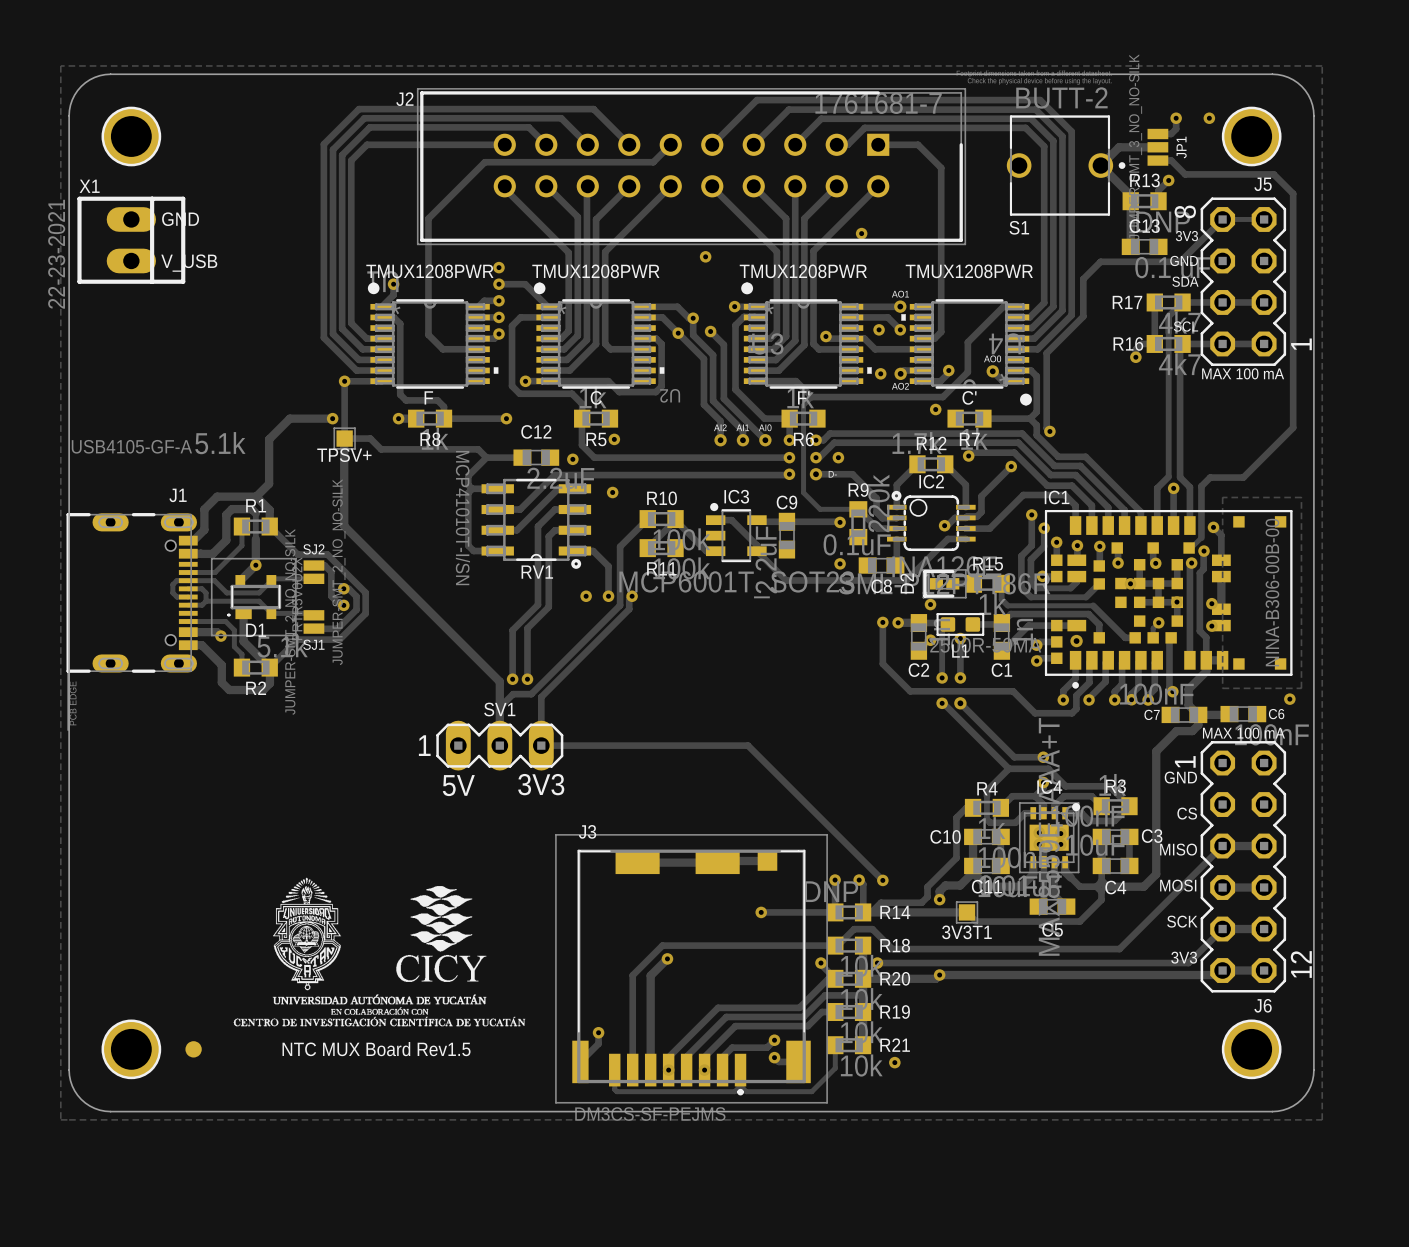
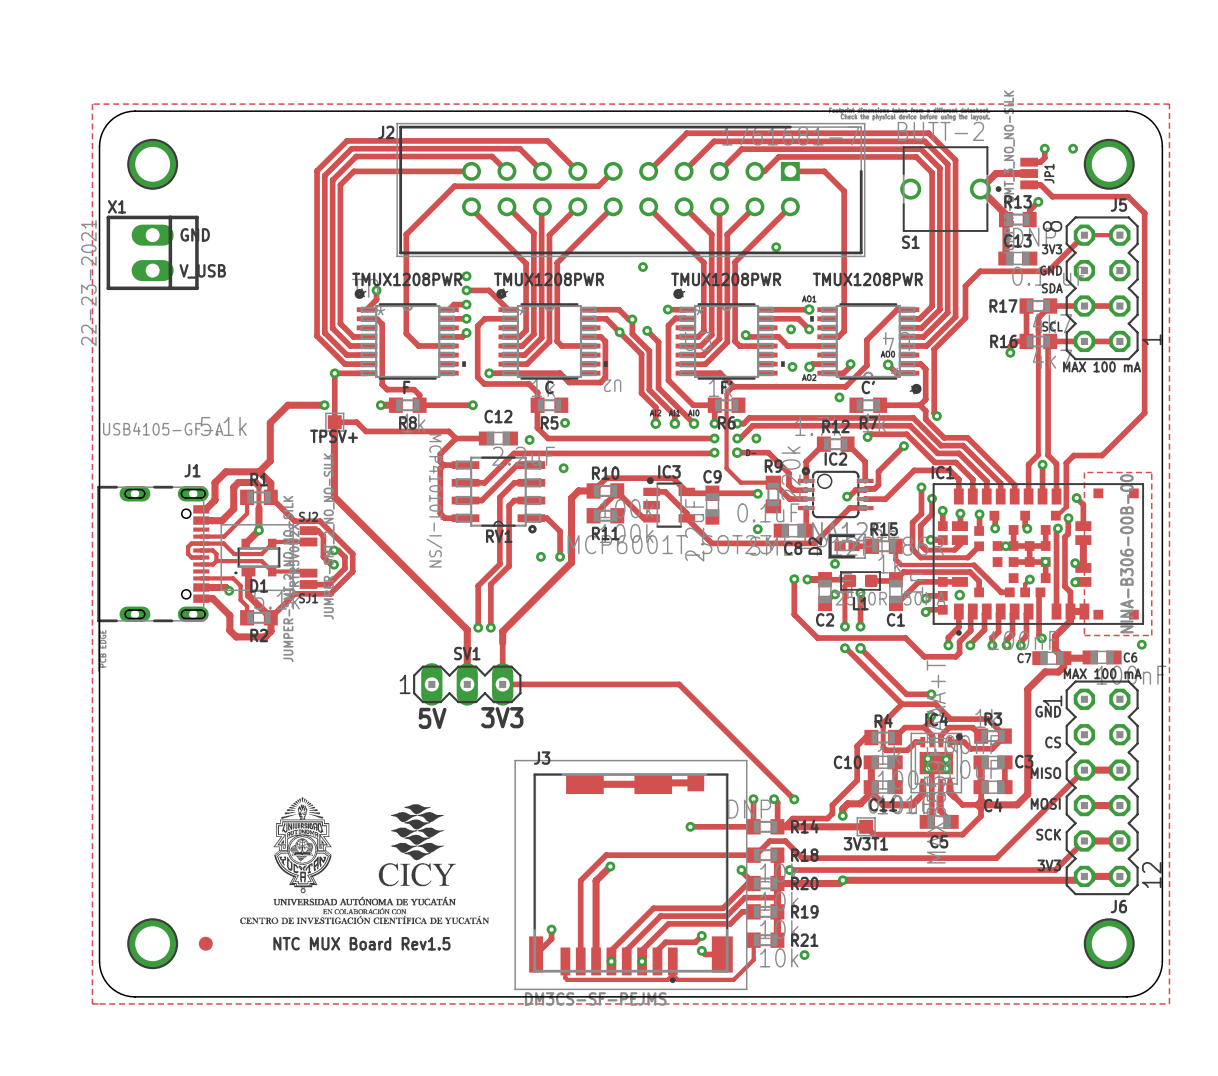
track: (647, 519) (620, 546) (620, 605) (531, 694) (513, 694) (499, 707) (499, 745) -> none
track: (632, 596) (629, 599) (629, 609) (541, 697) -> (686, 491) (673, 478) (606, 478) (593, 490) (578, 490) (571, 498) (571, 562) (502, 631) (502, 642)
via: (632, 596) -> none

